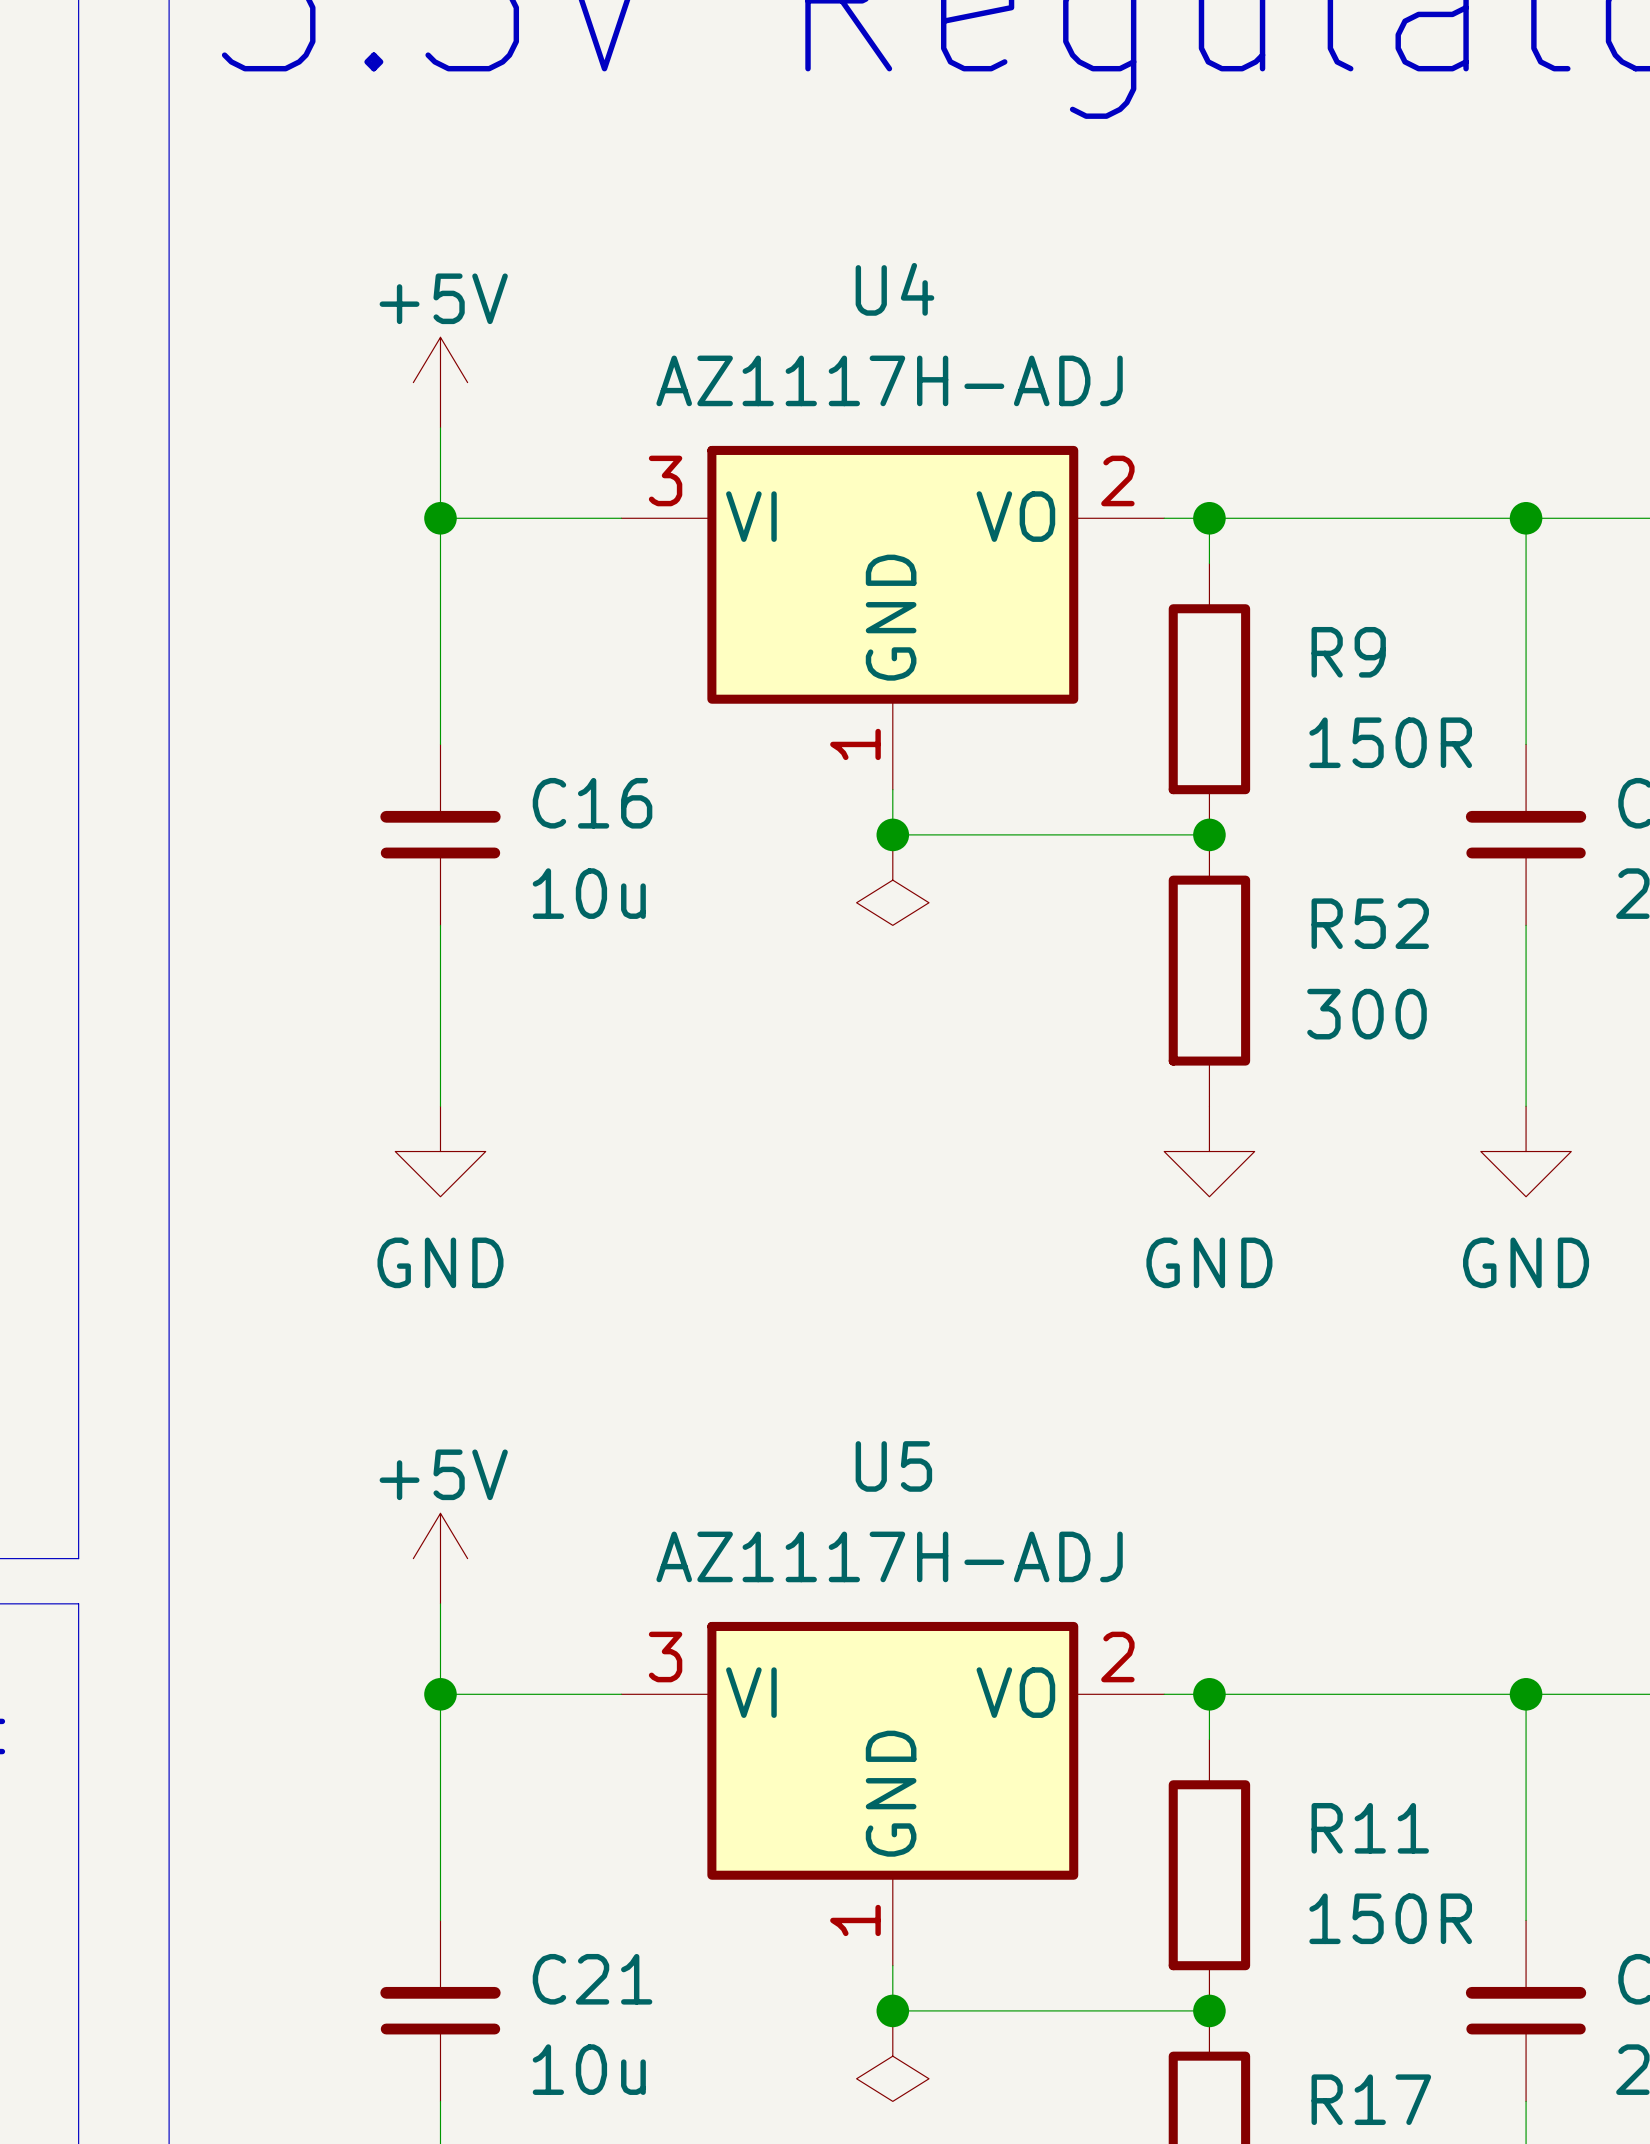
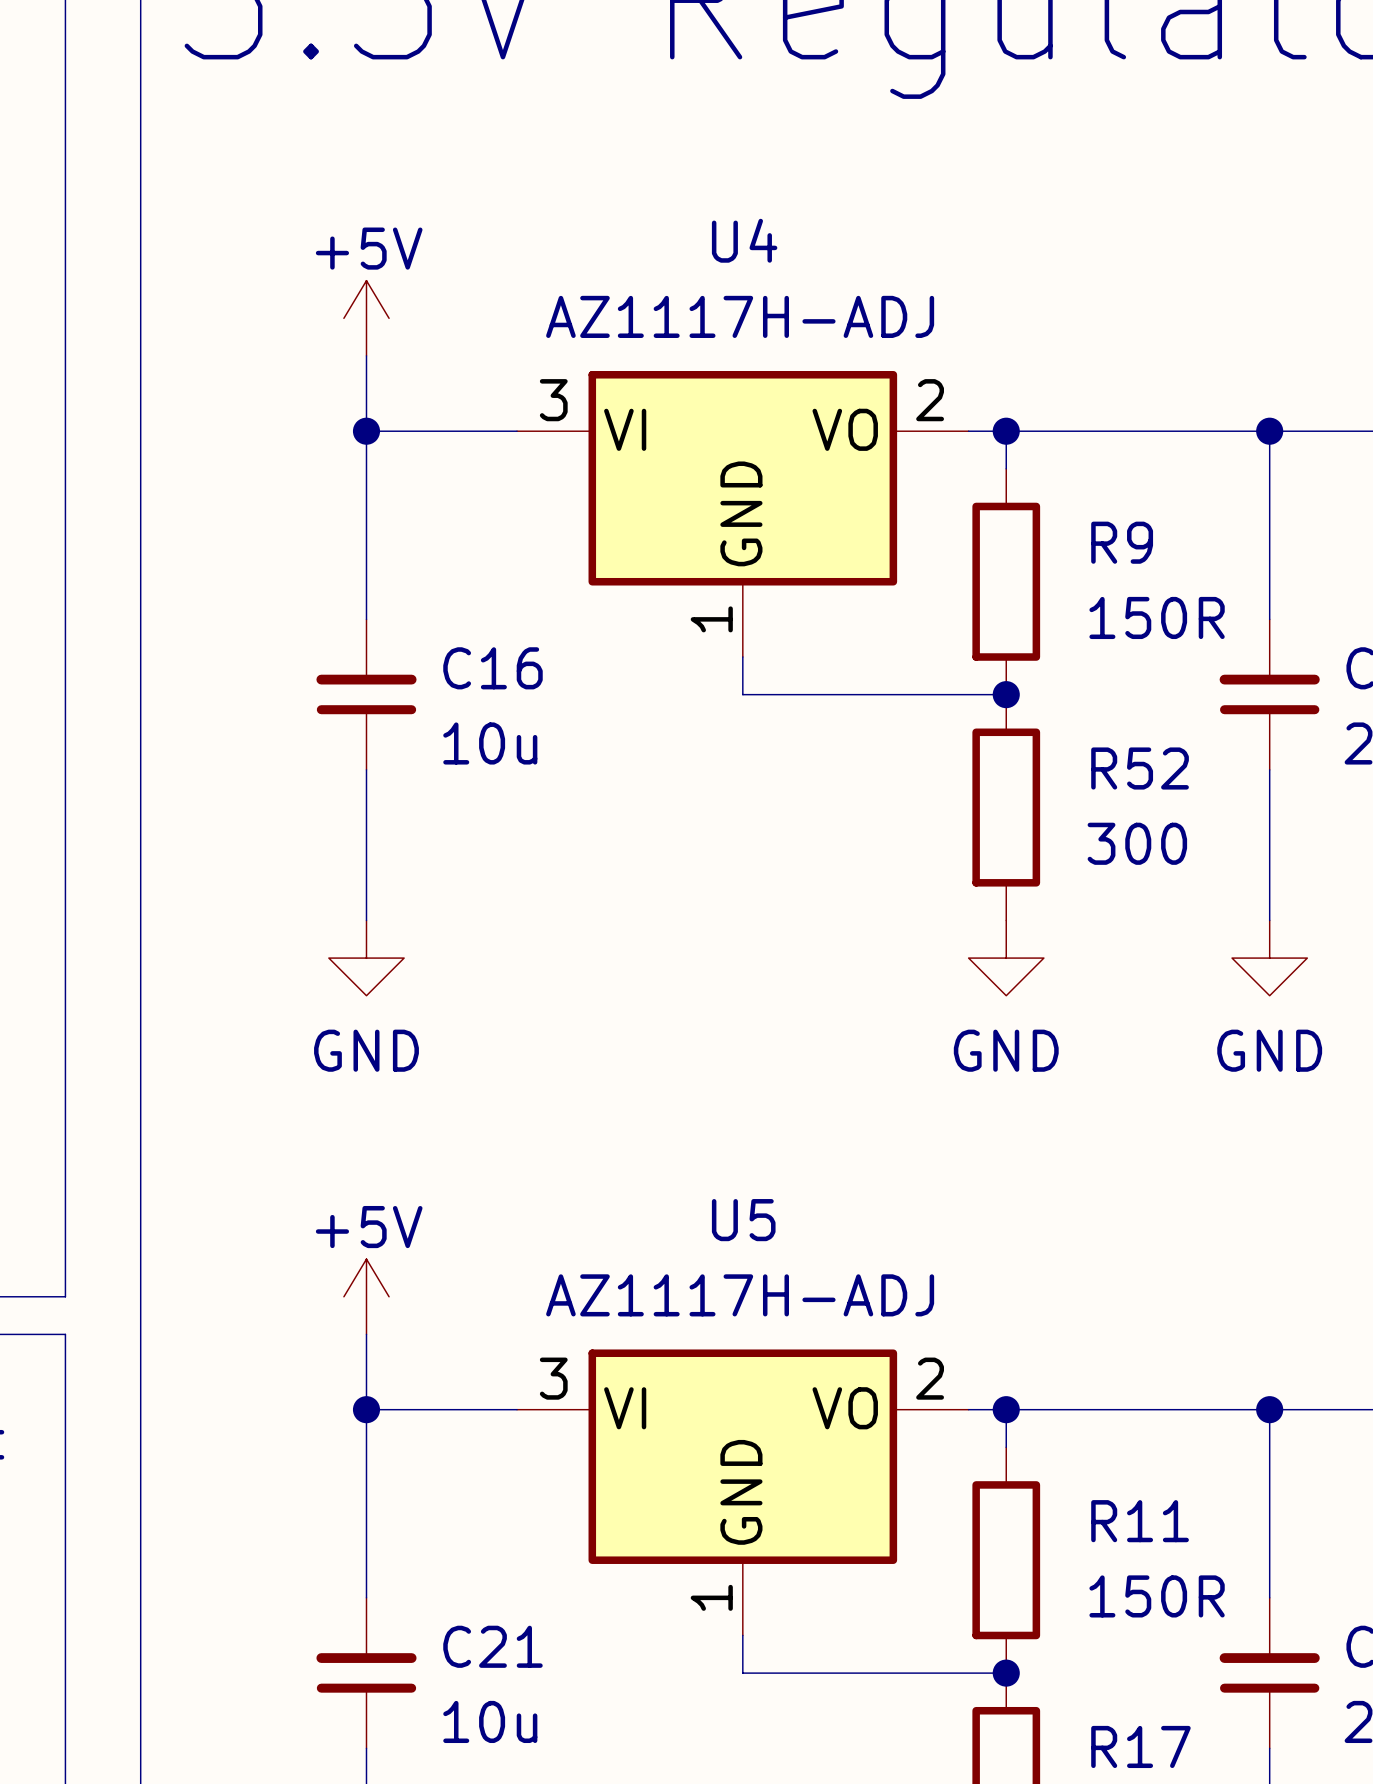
junction: (892, 834) -> none
power symbol: (892, 880) -> none
junction: (892, 2010) -> none
power symbol: (892, 2056) -> none

